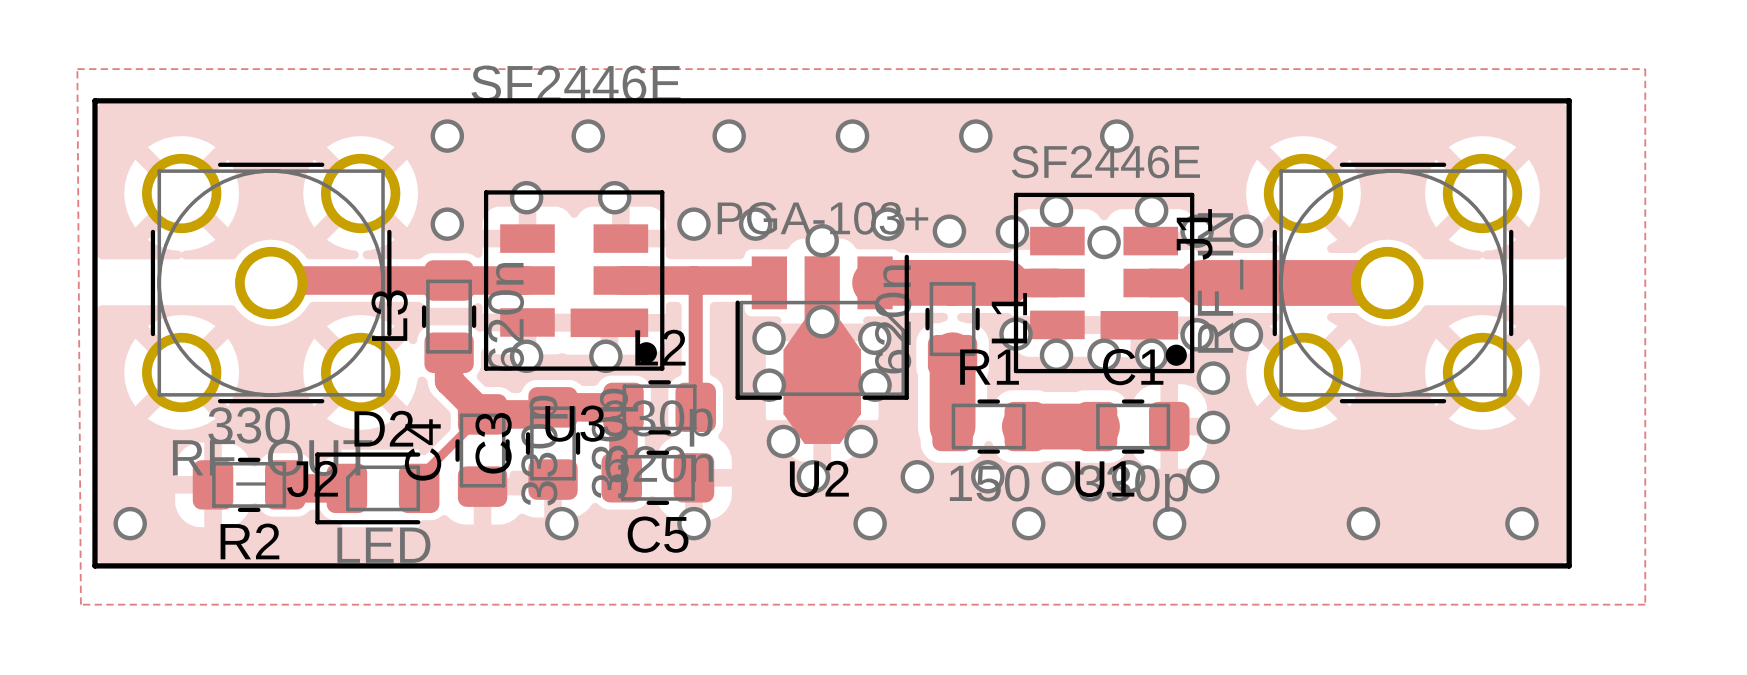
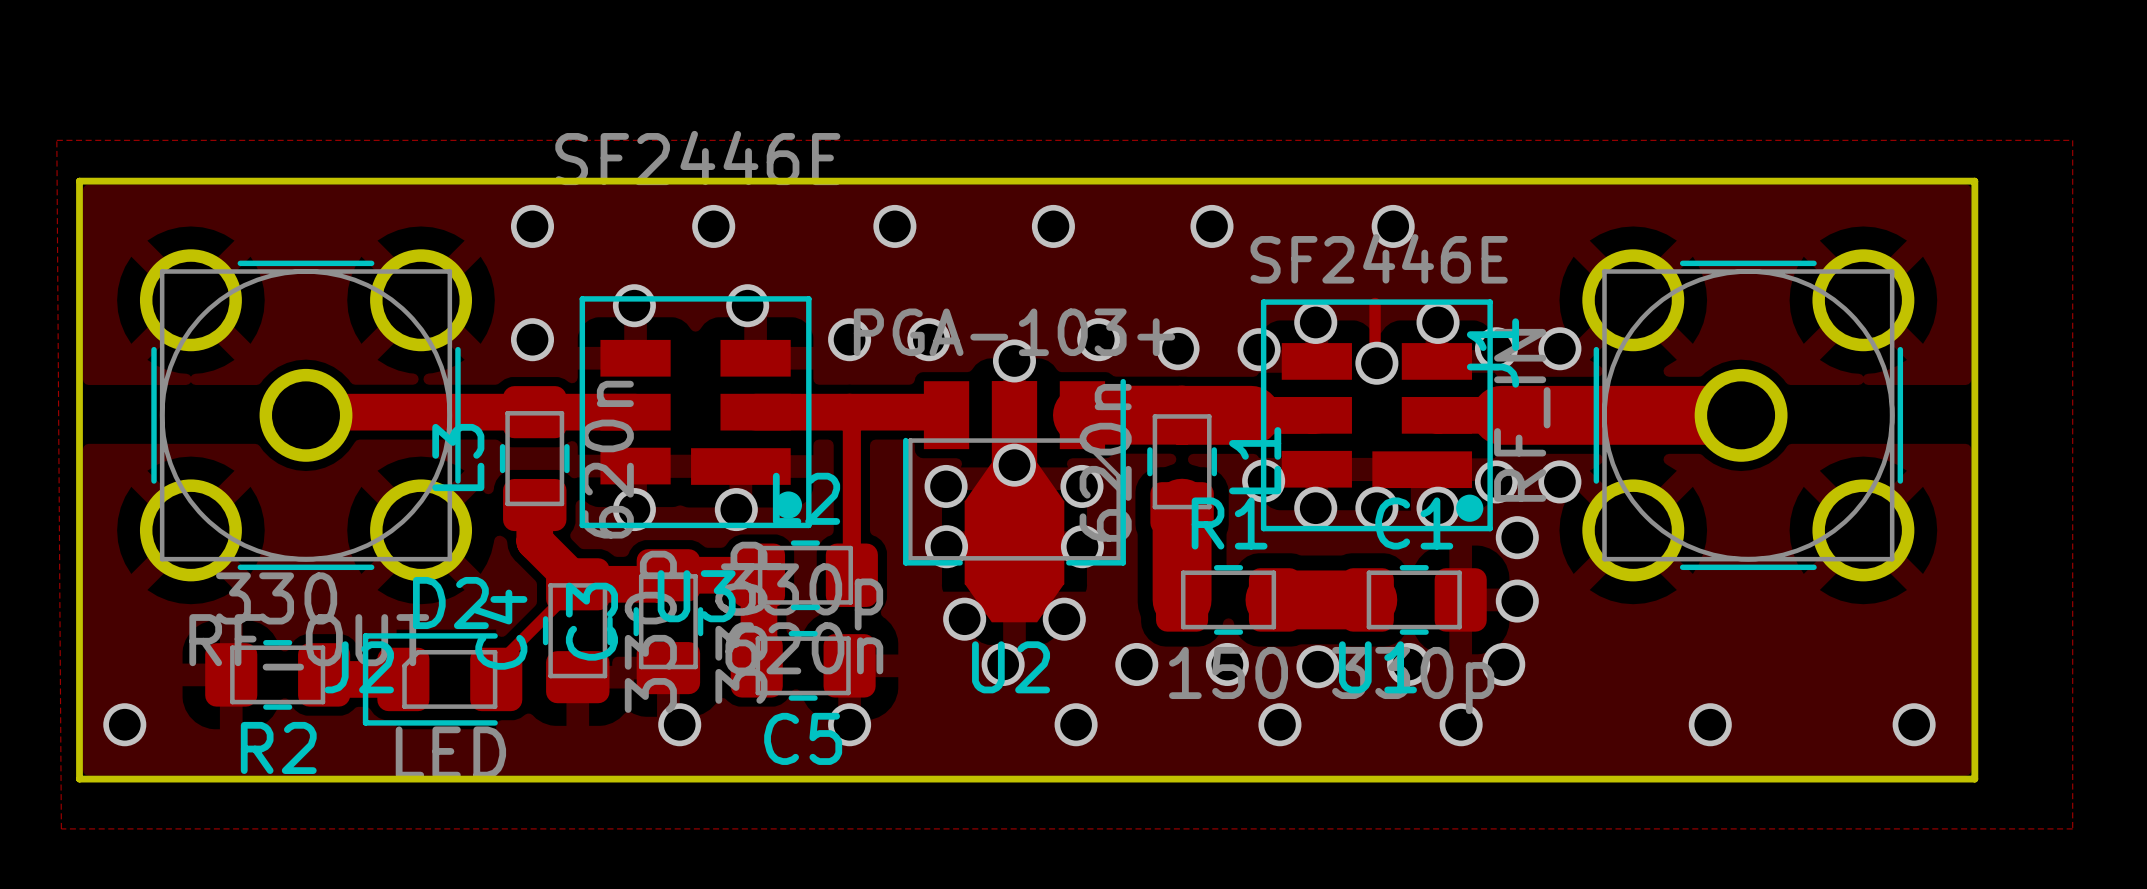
track: none -> (1375, 303) (1375, 361) (1376, 363)

